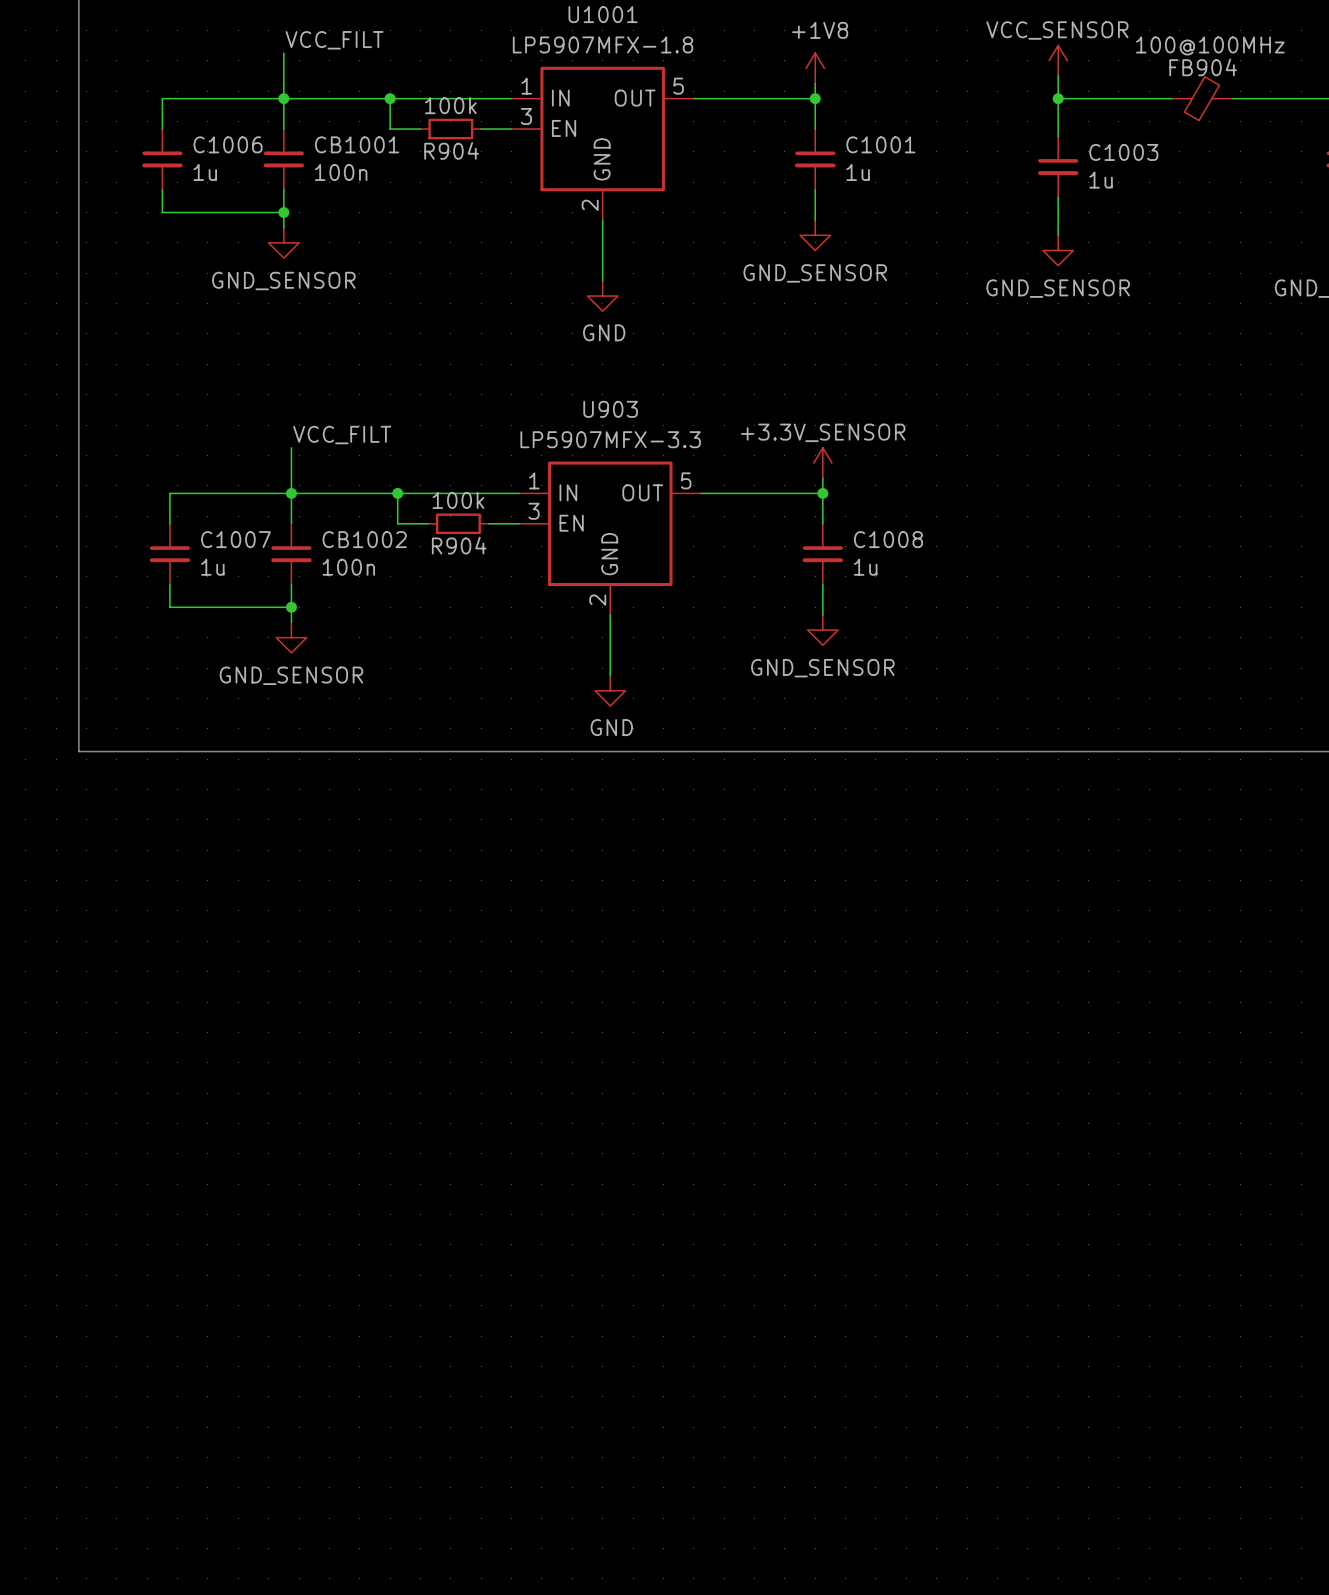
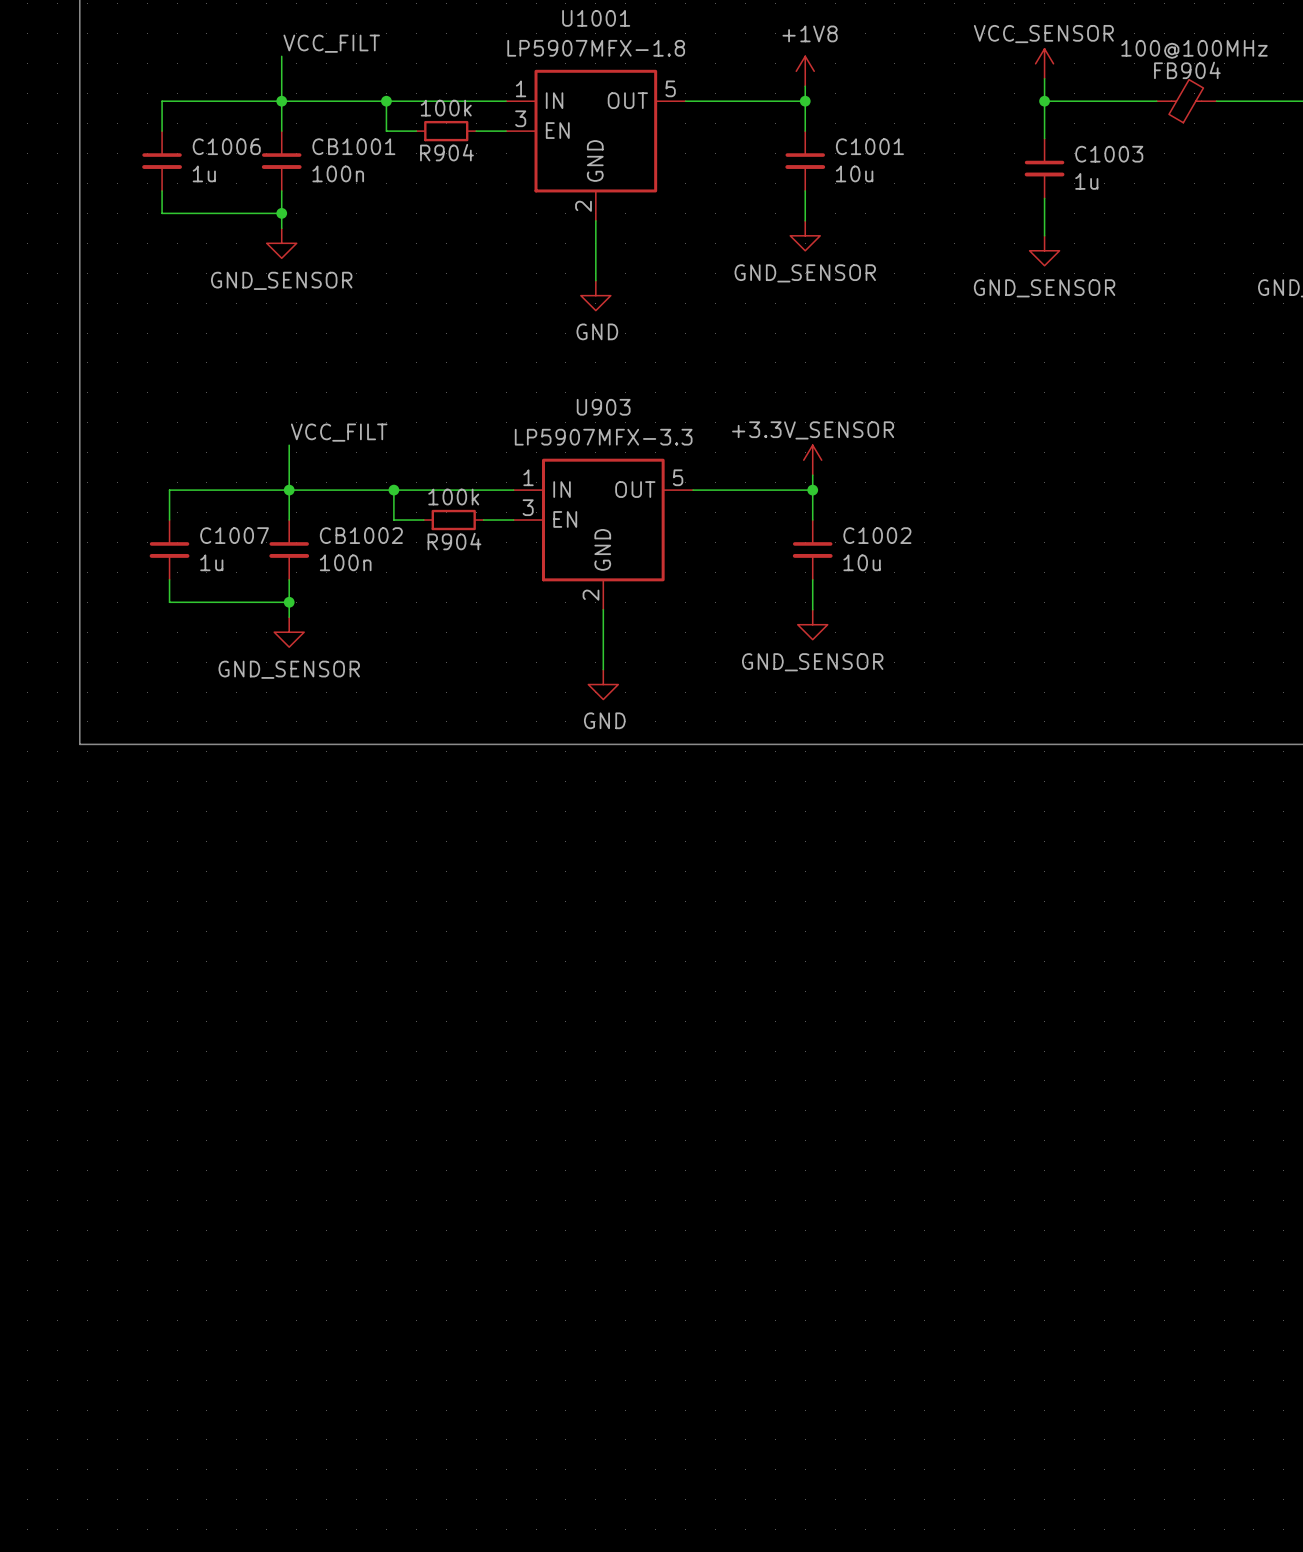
C1001 value: 1u (858, 172) -> 10u (854, 173)
C1008 name: C1008 (888, 539) -> C1002 (877, 535)
C1008 value: 1u (865, 567) -> 10u (862, 562)

